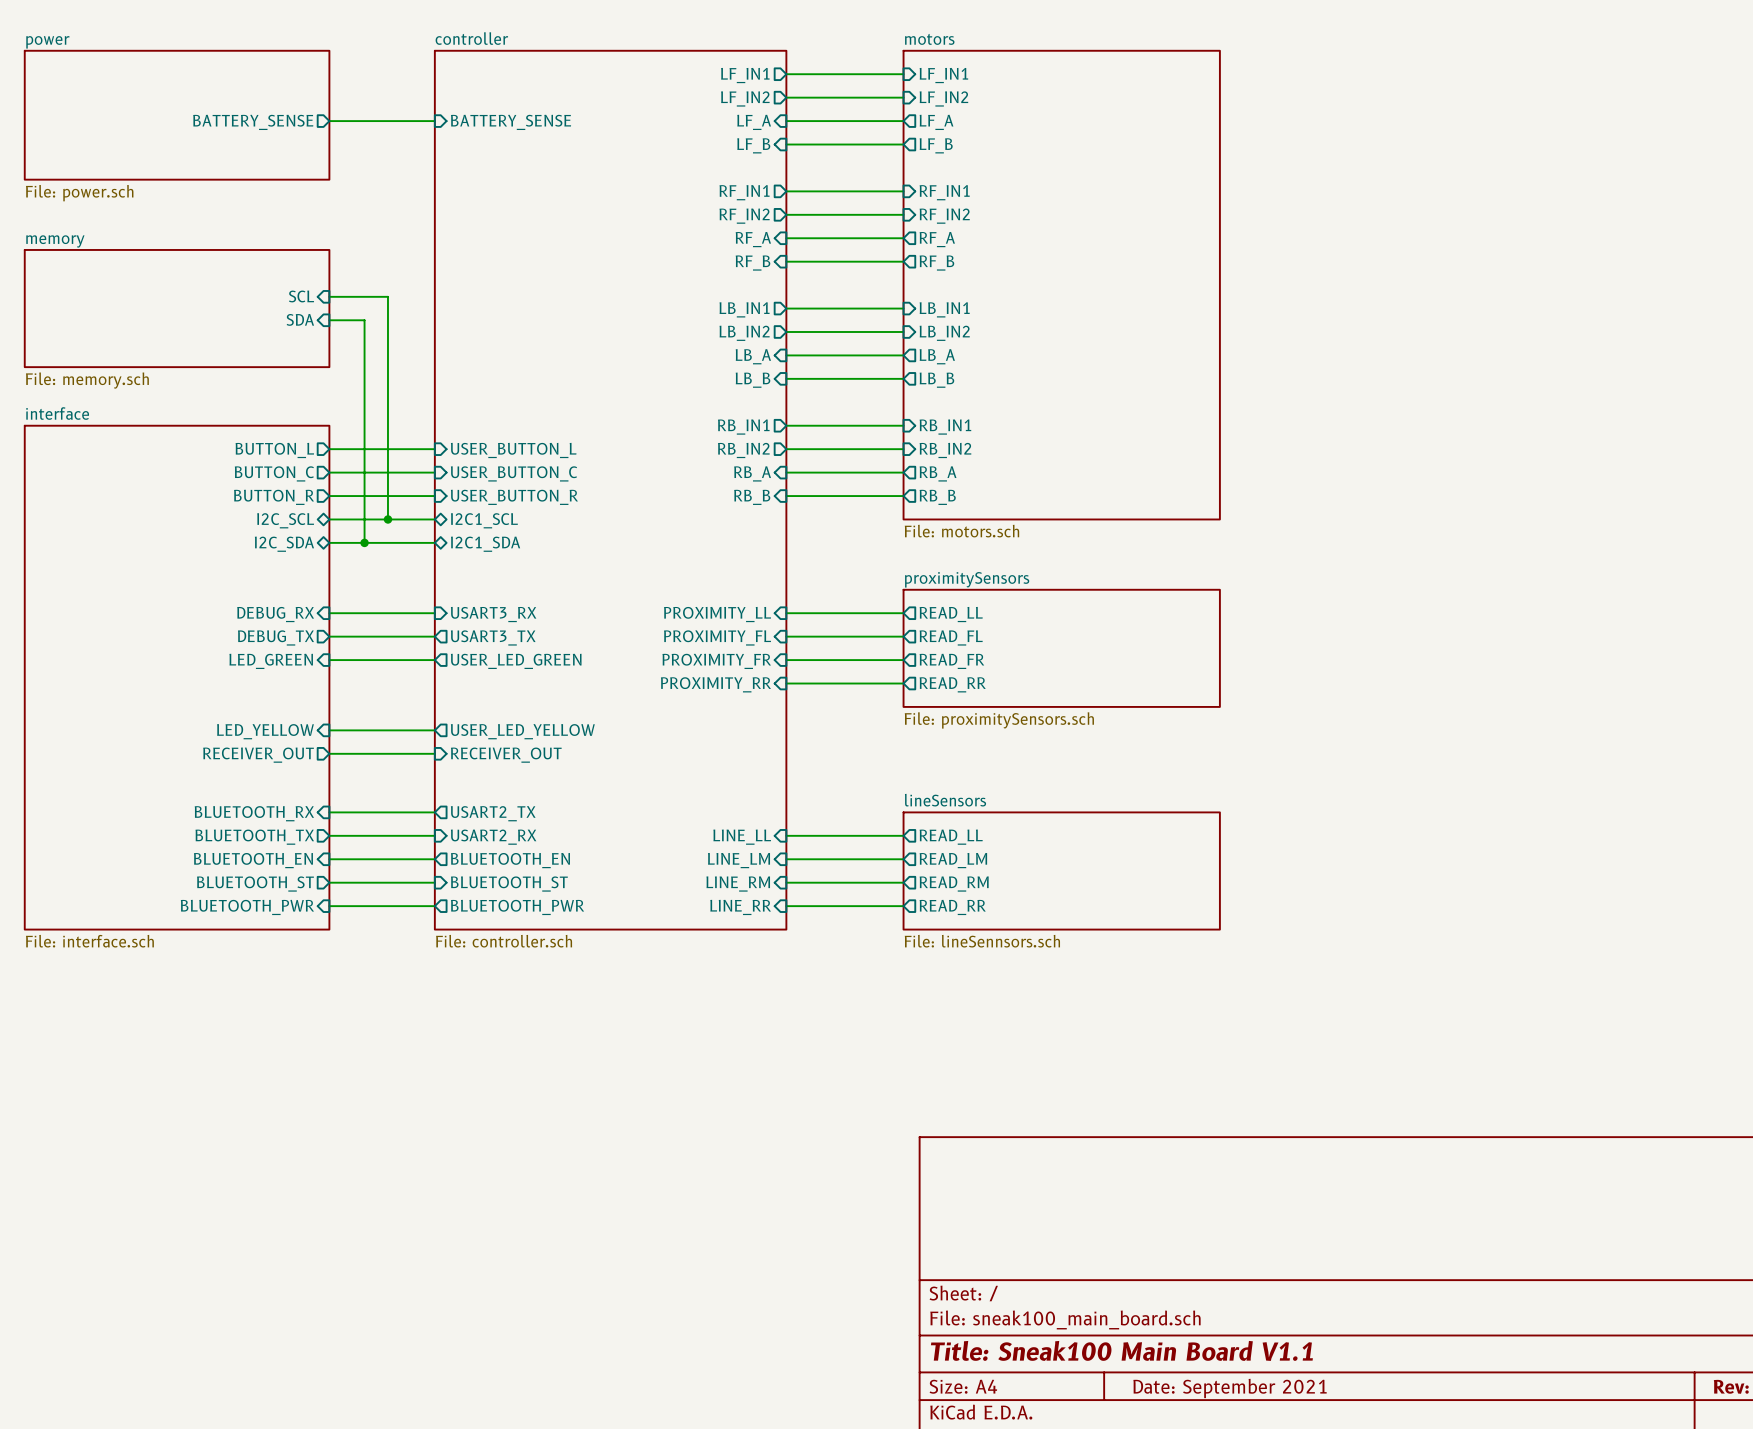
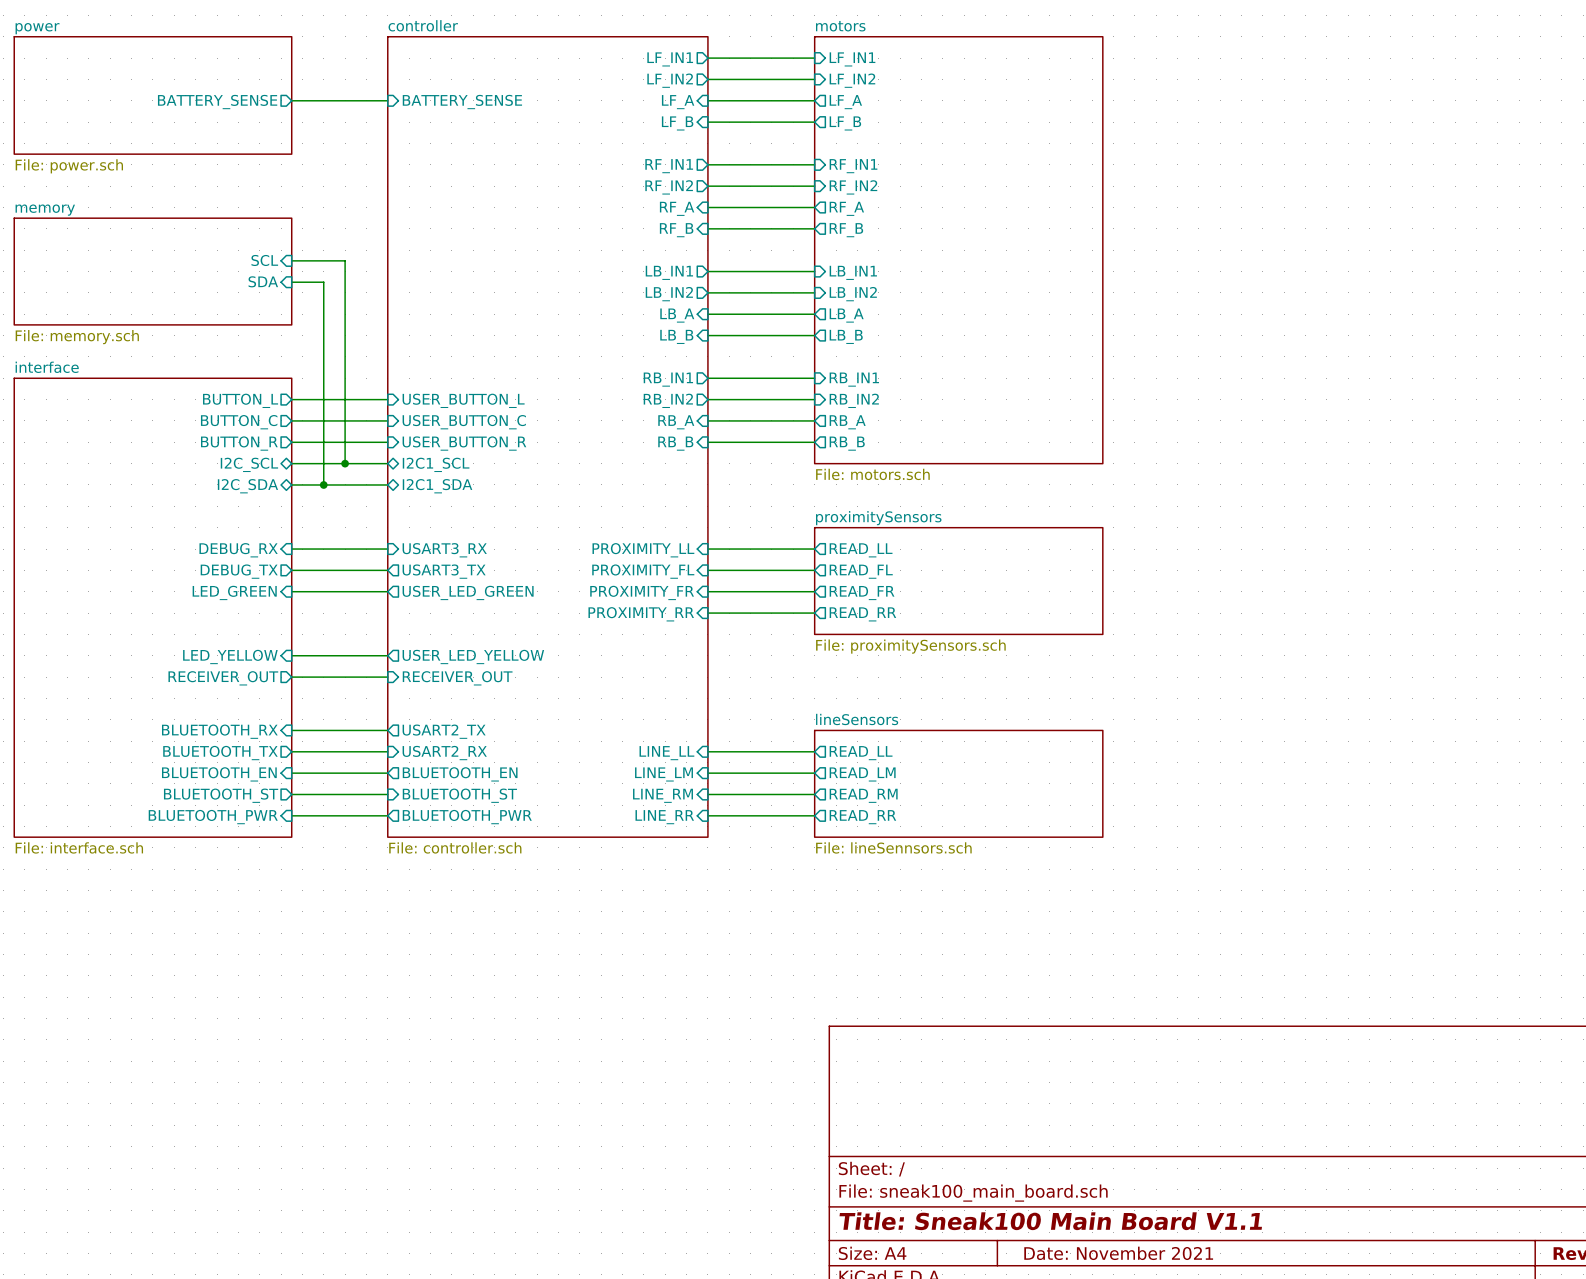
title block: Date: September 2021 (1230, 1388) -> Date: November 2021 (1118, 1253)

